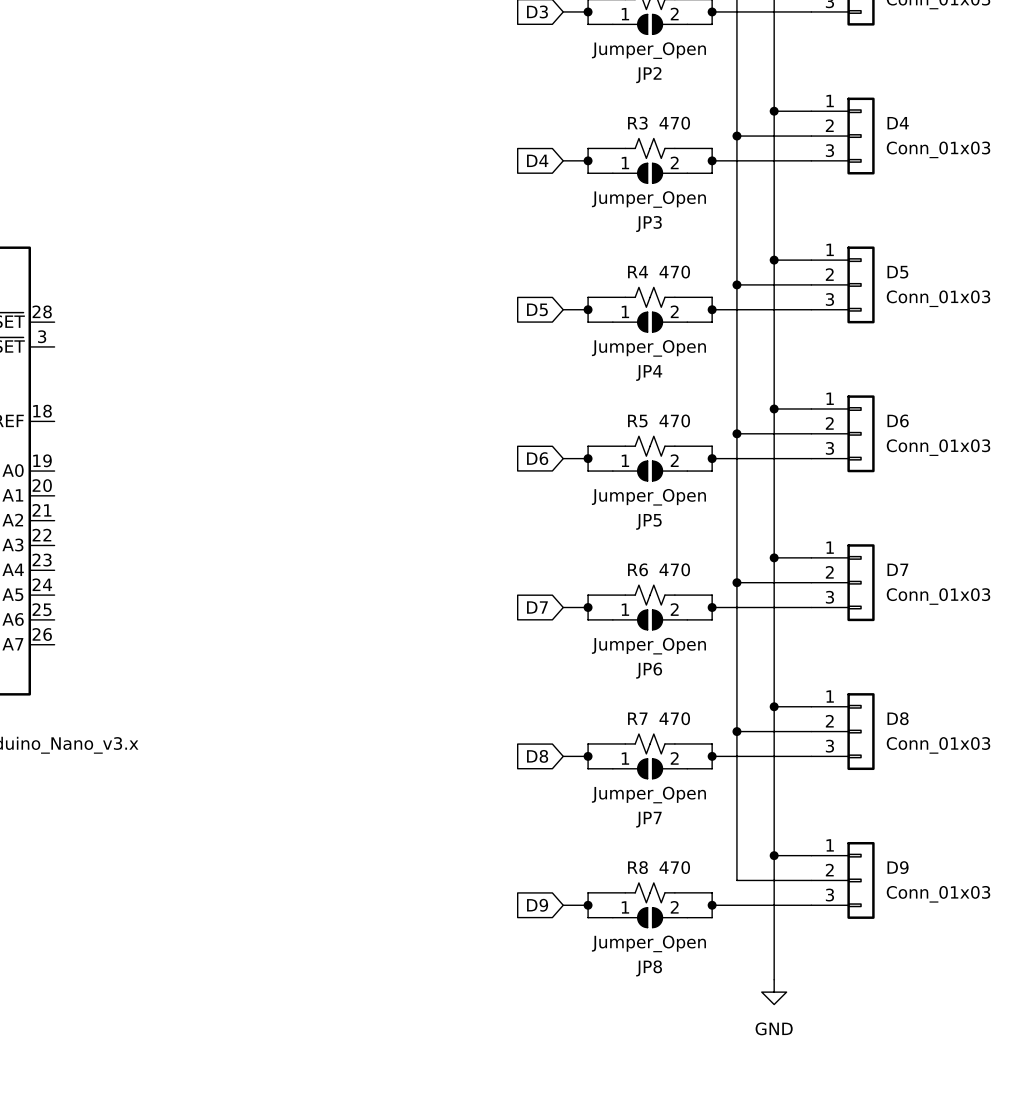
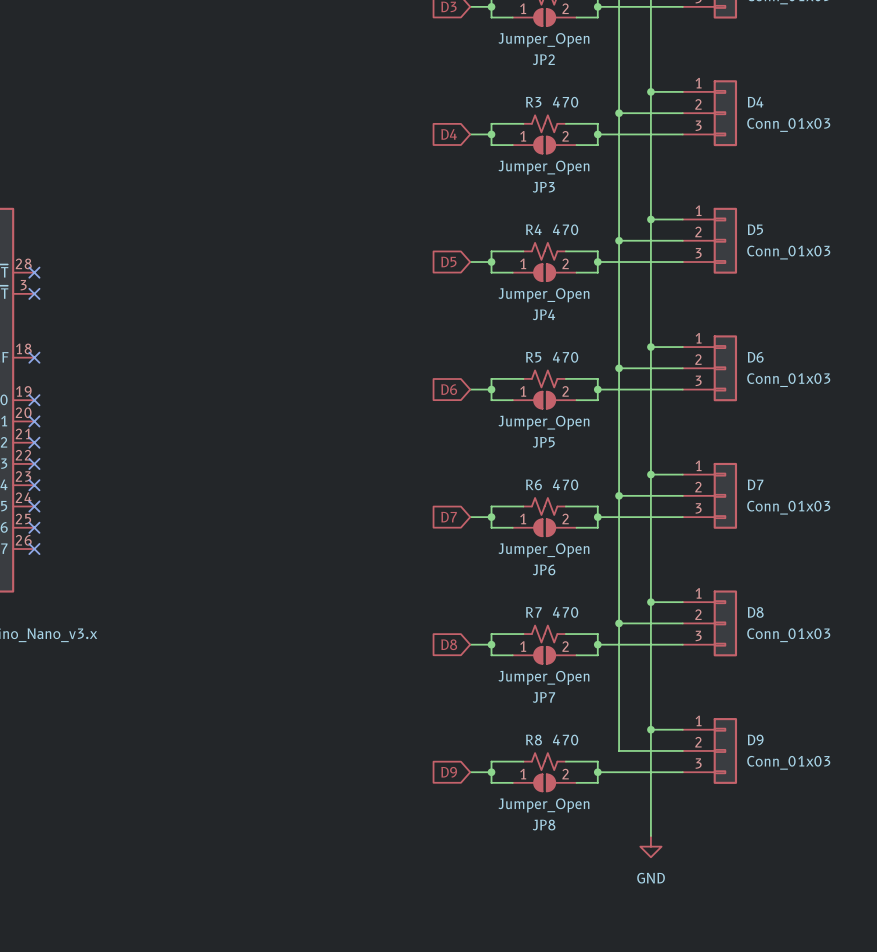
no-connect mark: none -> (34, 272)
no-connect mark: none -> (34, 293)
no-connect mark: none -> (34, 357)
no-connect mark: none -> (34, 400)
no-connect mark: none -> (34, 421)
no-connect mark: none -> (34, 442)
no-connect mark: none -> (34, 463)
no-connect mark: none -> (34, 485)
no-connect mark: none -> (34, 506)
no-connect mark: none -> (34, 527)
no-connect mark: none -> (34, 549)

